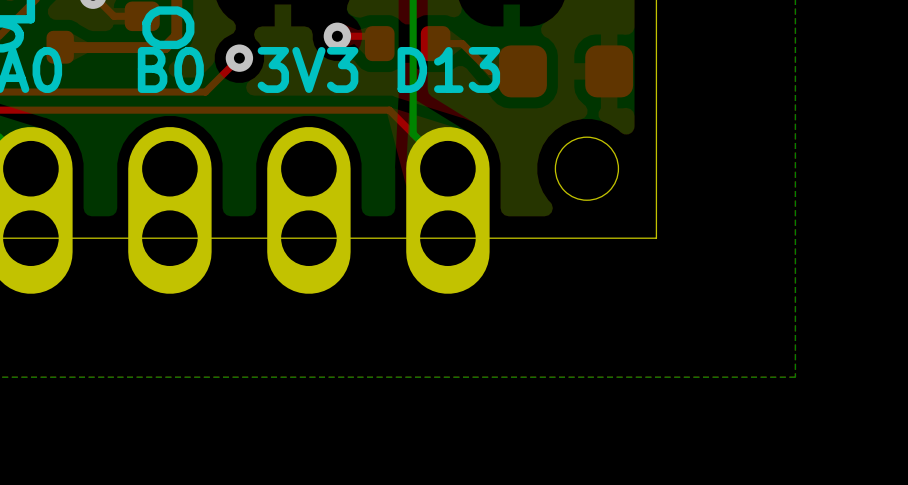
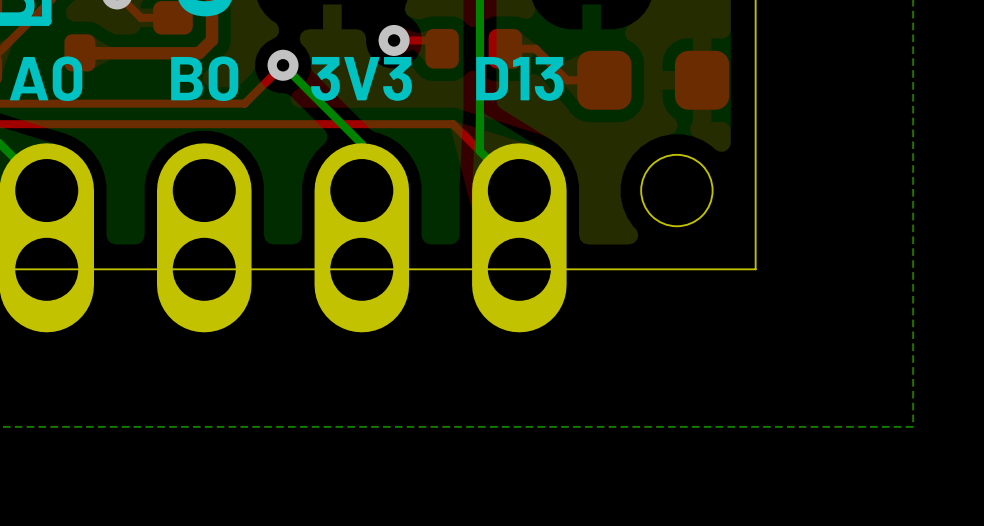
bottom track: none -> (283, 65) (361, 144) (361, 190)

